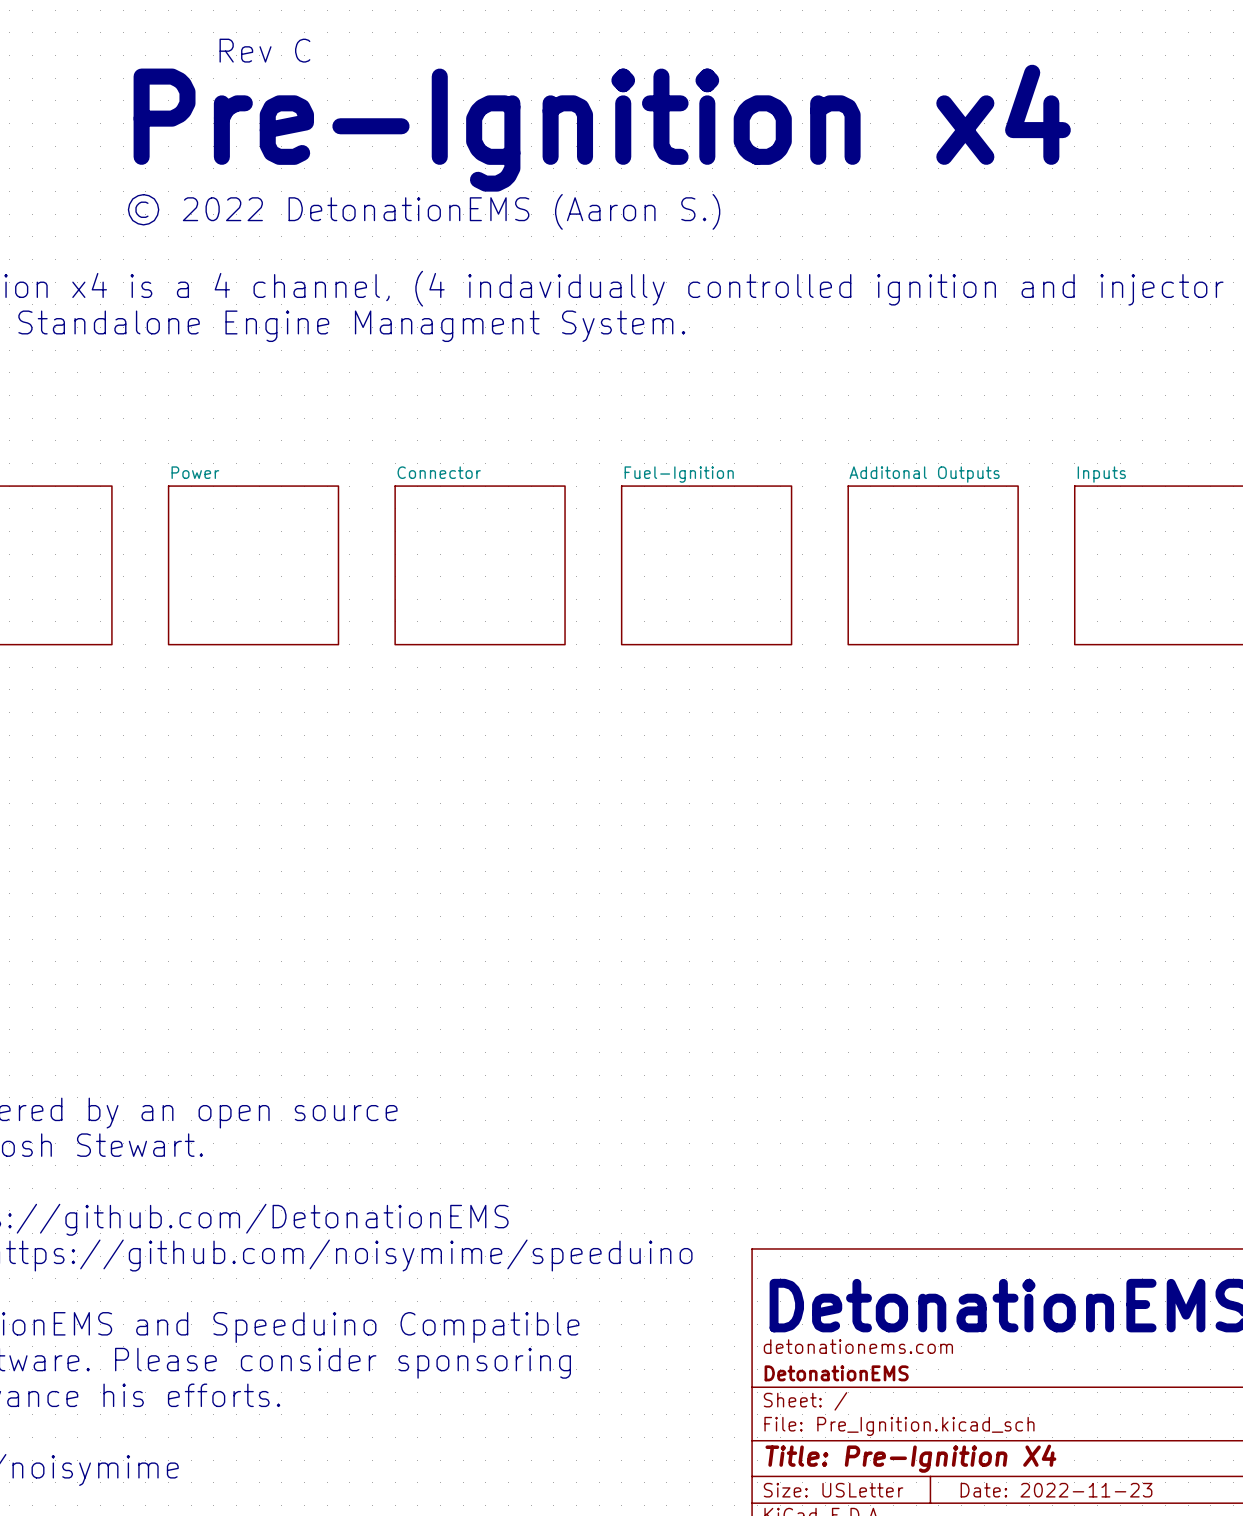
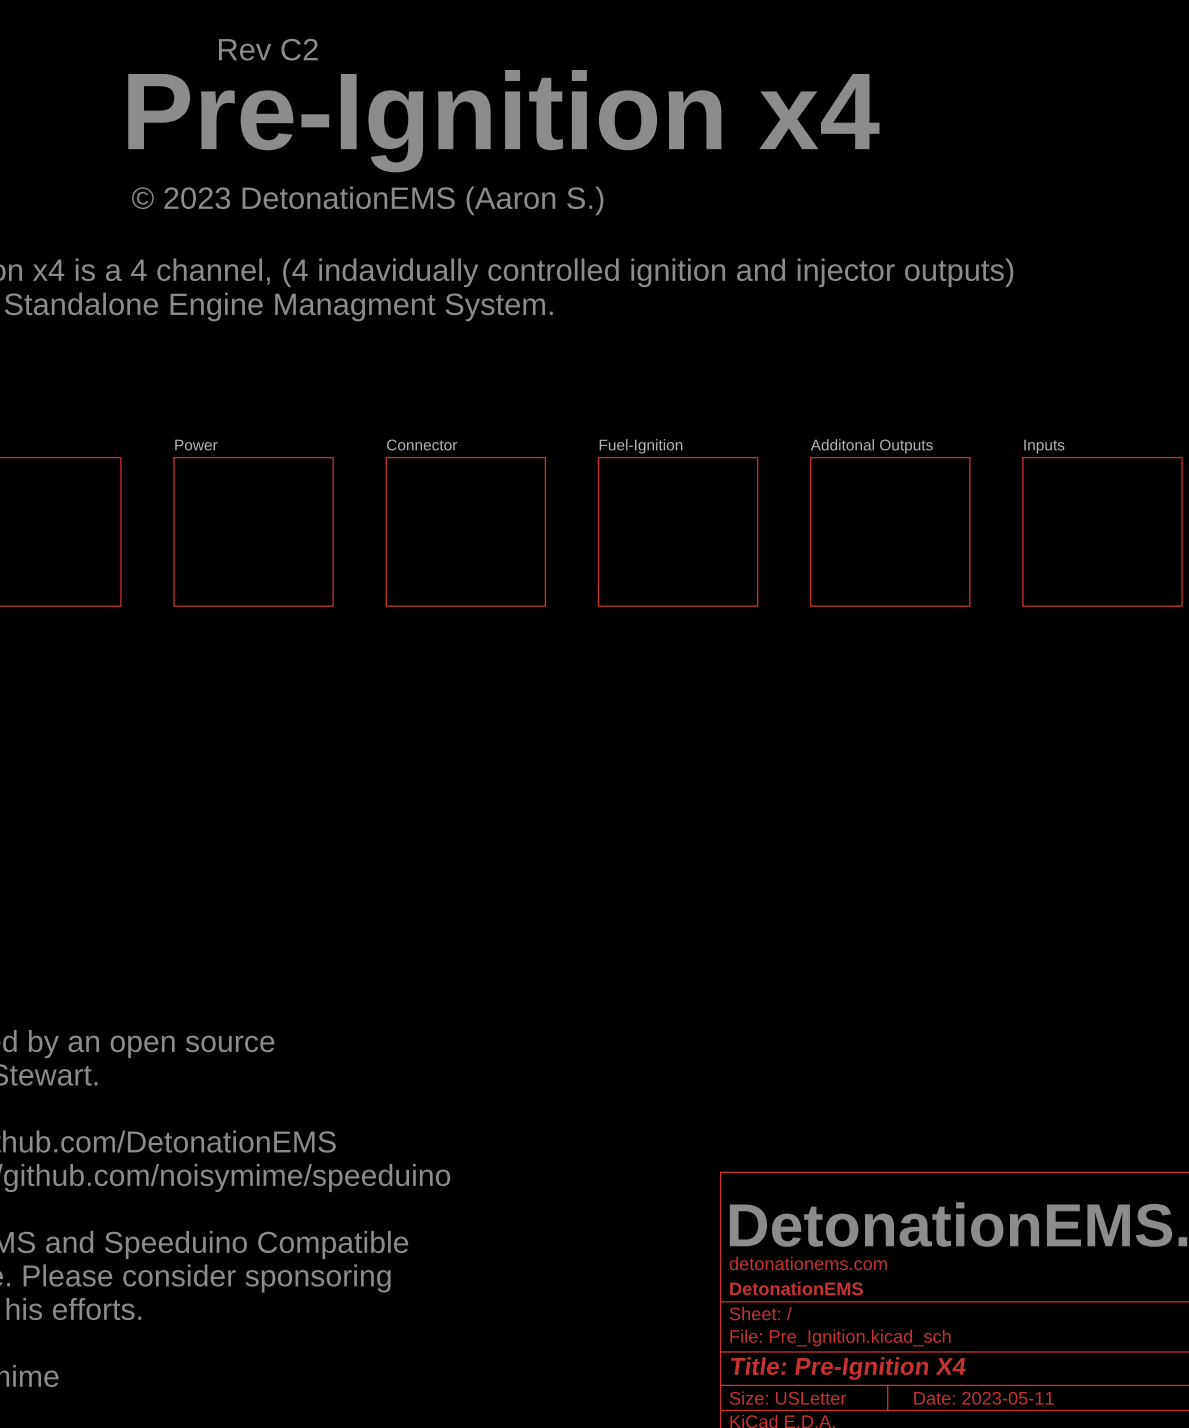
text: Rev C (264, 50) -> Rev C2 (268, 49)
text: © 2022 DetonationEMS (Aaron S.) (424, 211) -> © 2023 DetonationEMS (Aaron S.) (367, 200)
title block: Date: 2022-11-23 (1056, 1490) -> Date: 2023-05-11 (983, 1398)

